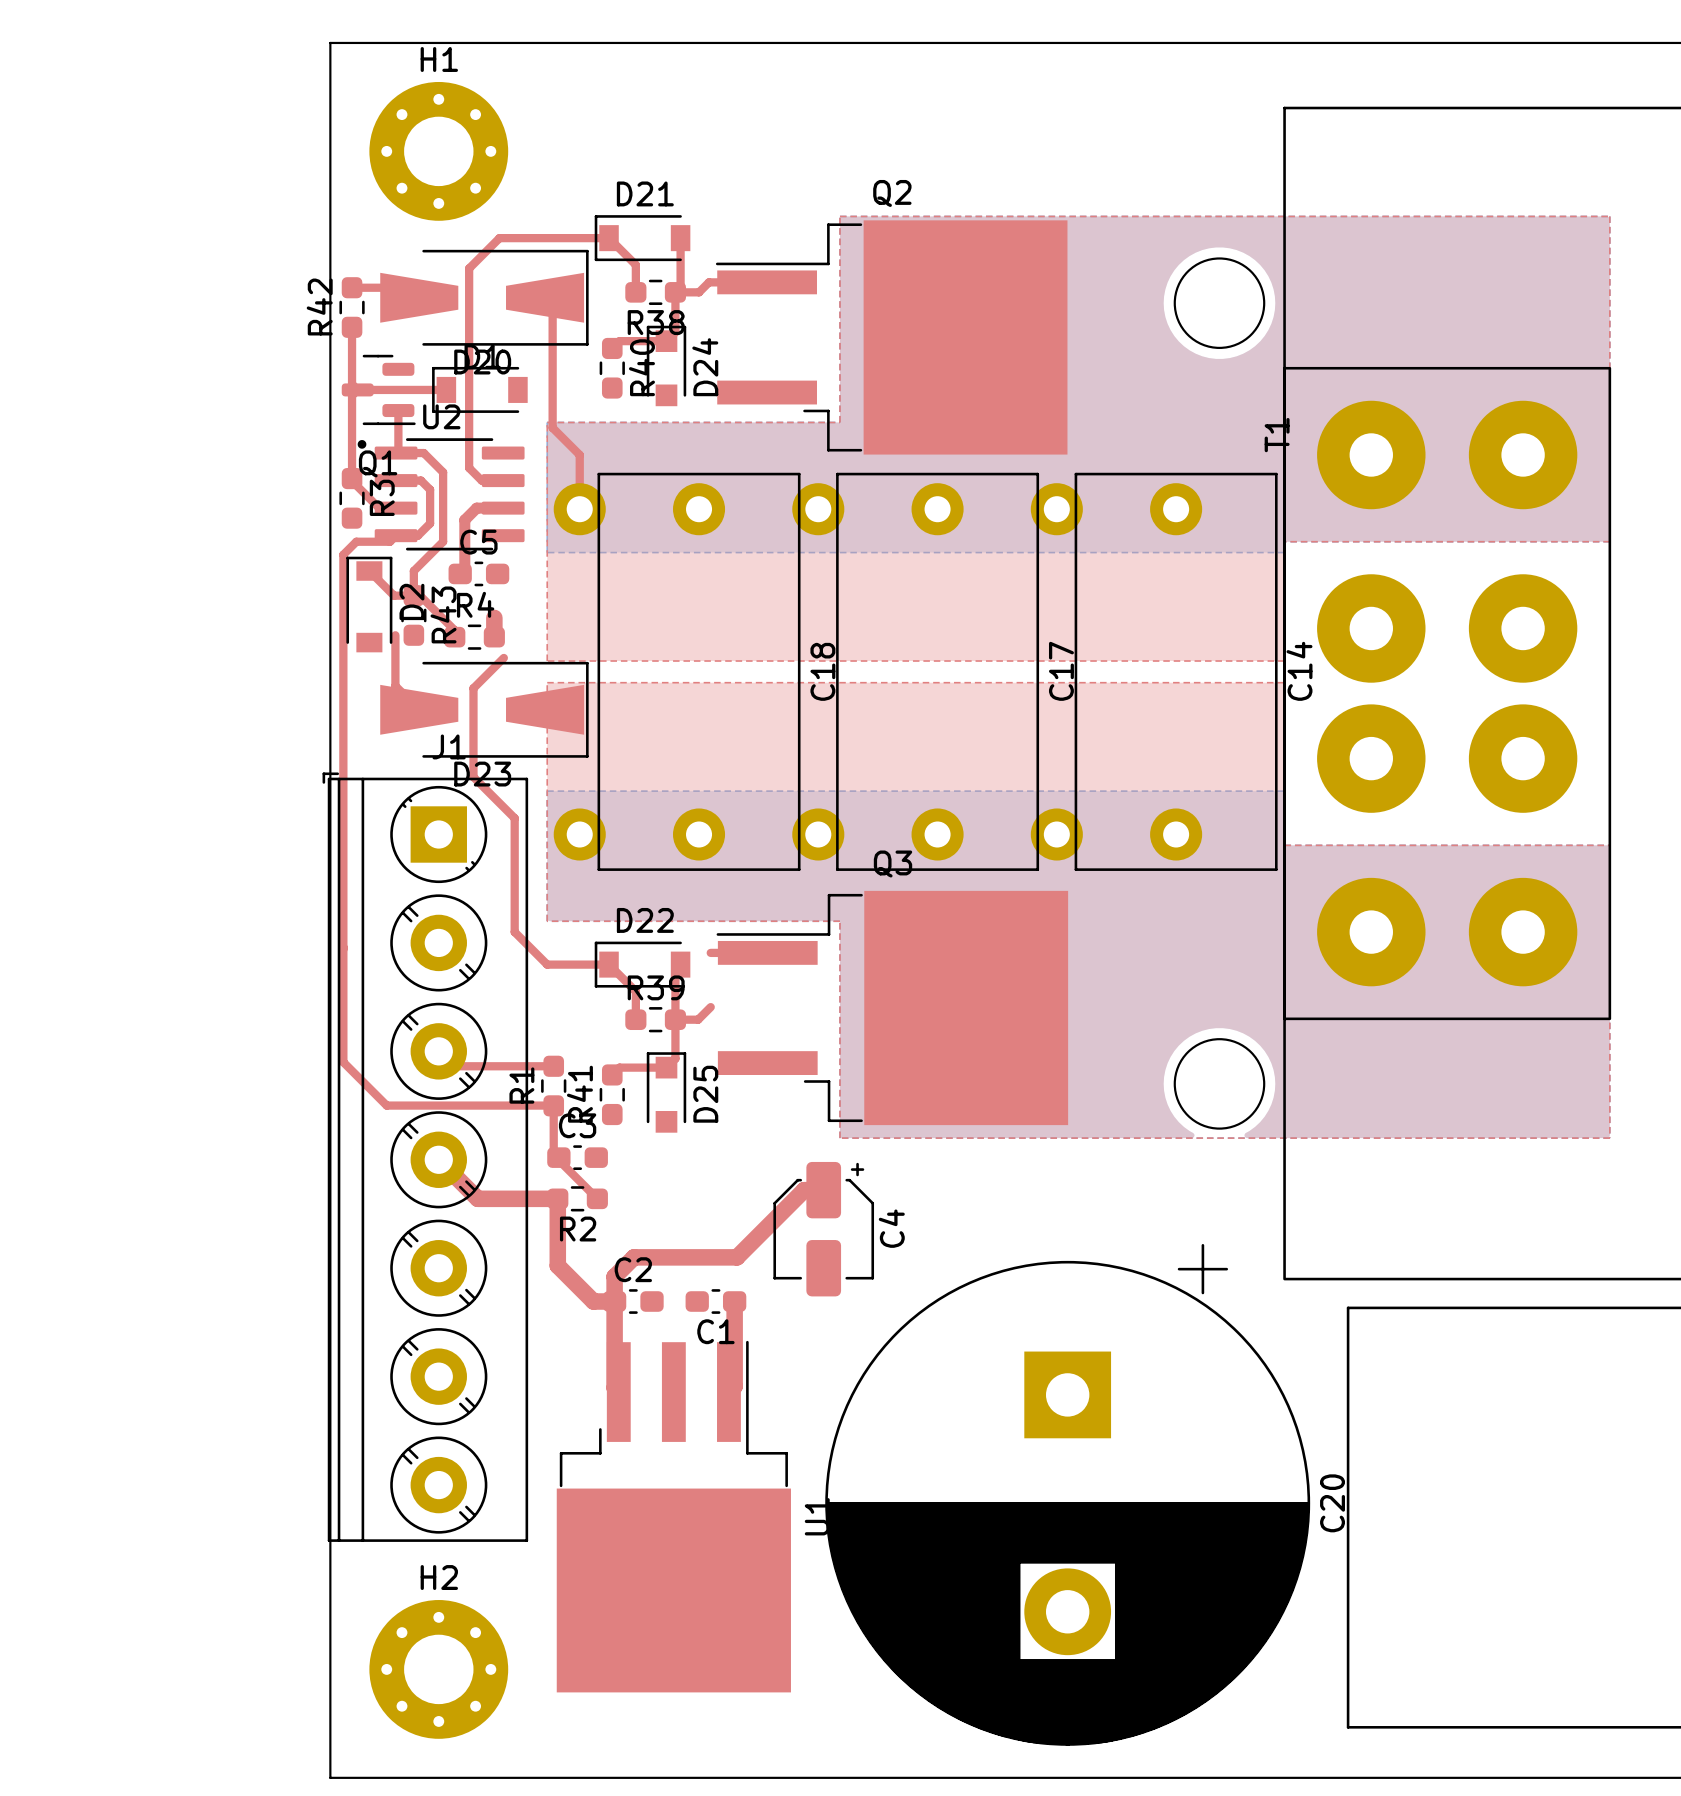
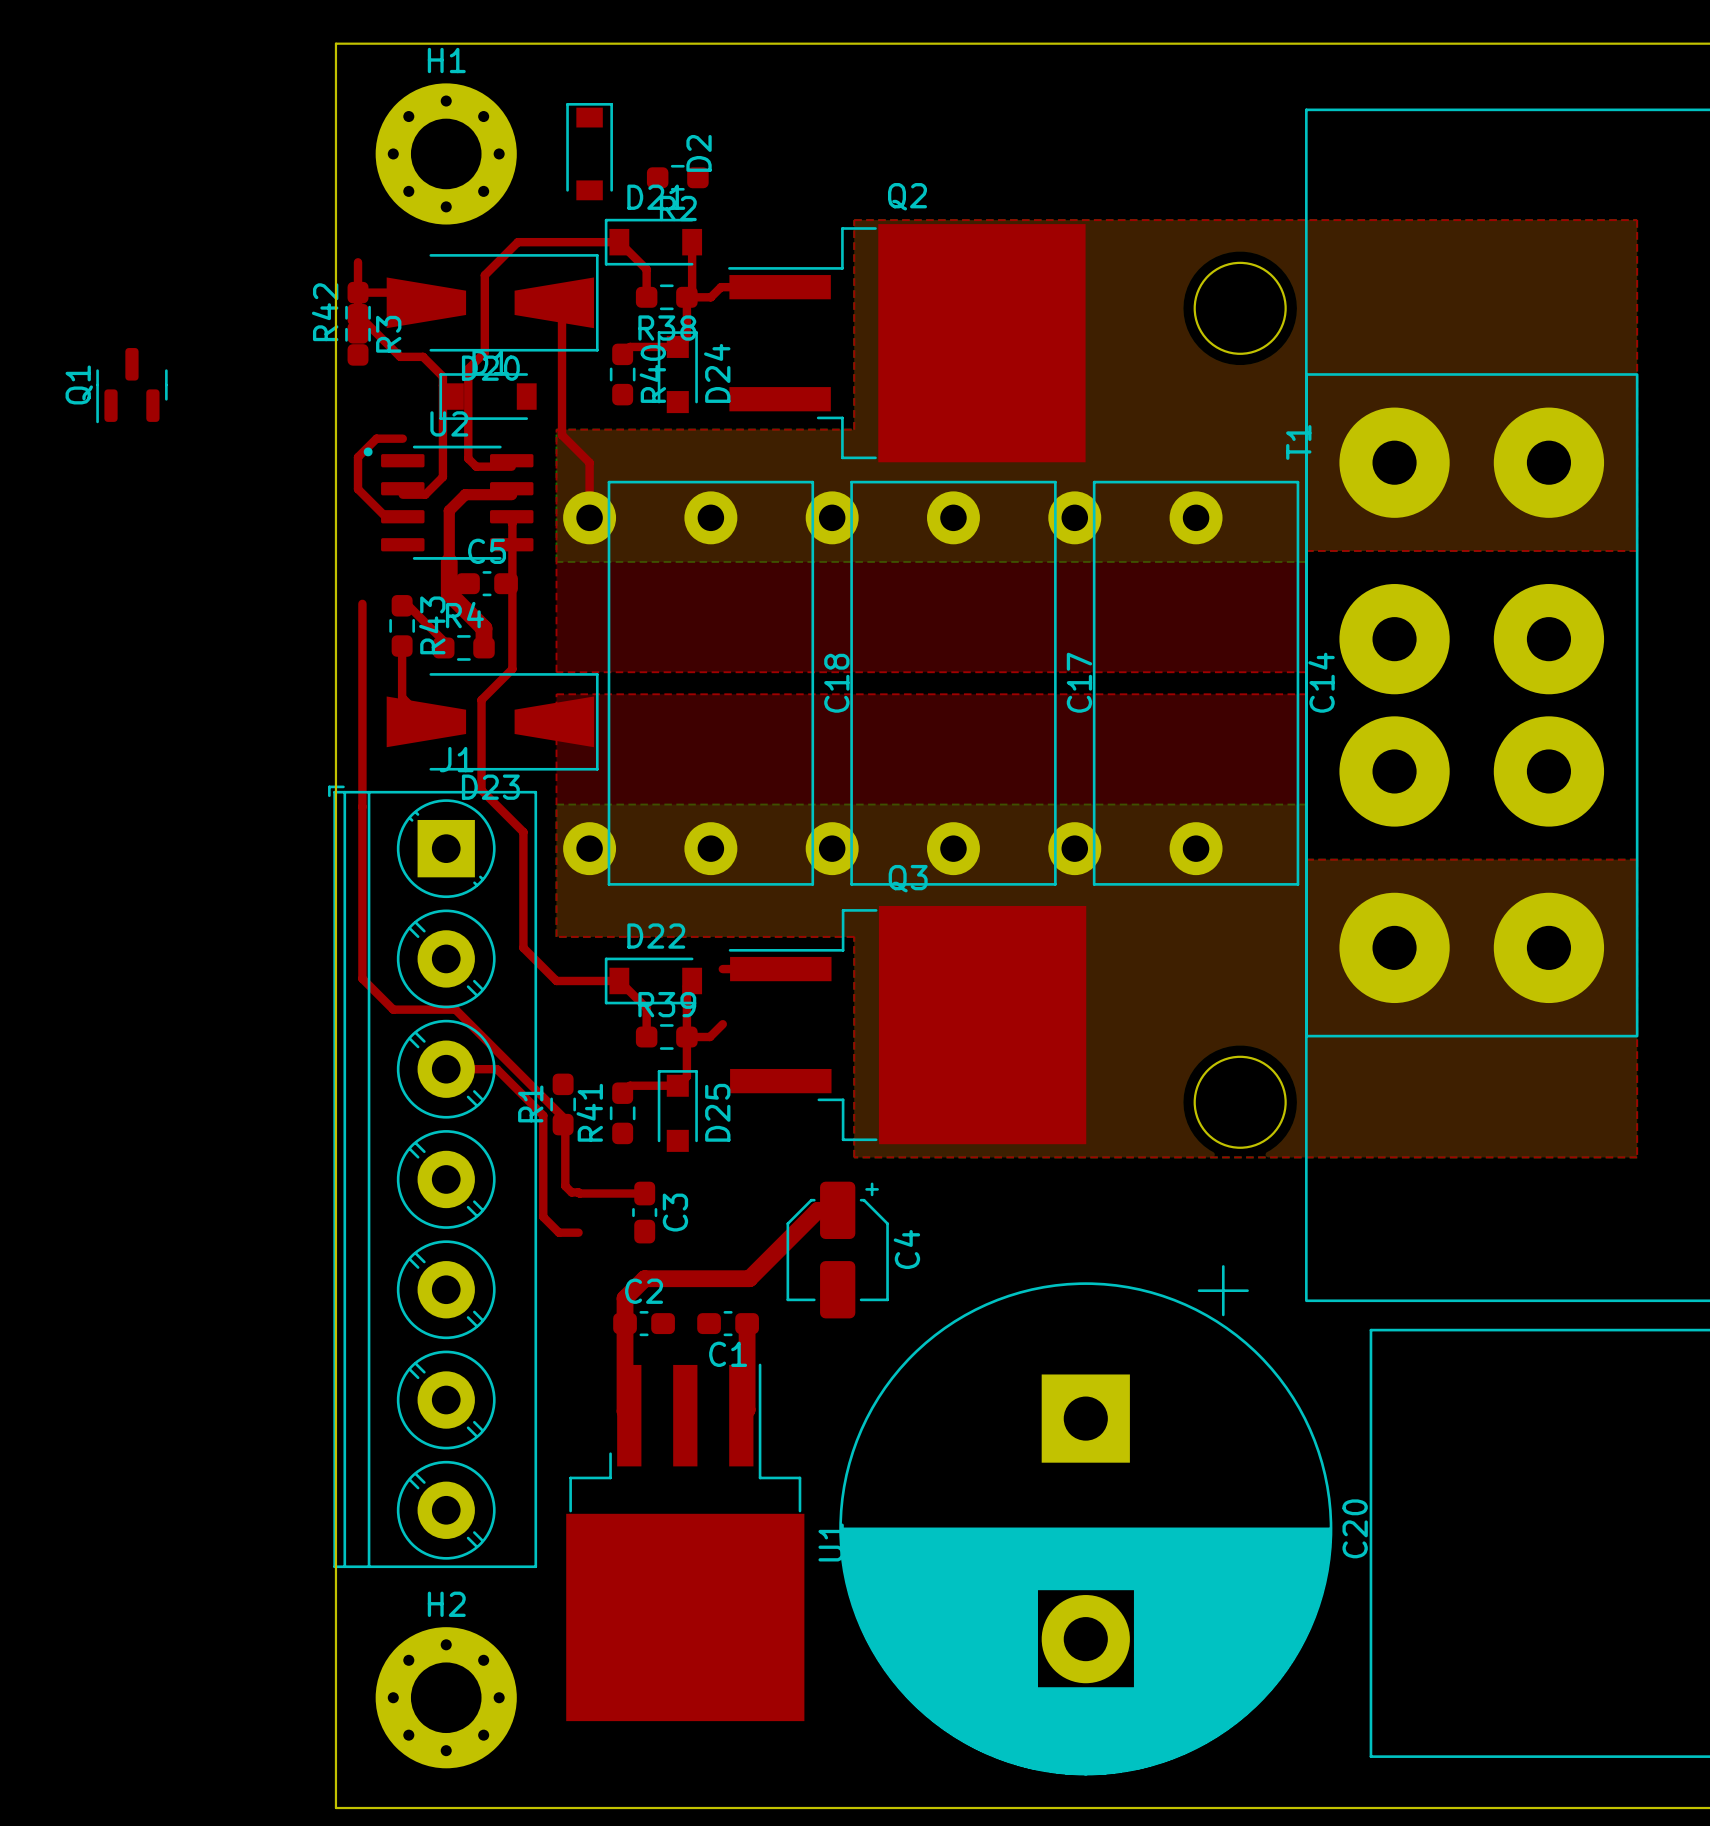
top track: (509, 238) (499, 238) (469, 268) (469, 468) (481, 480) (503, 480) -> (517, 242) (484, 275) (484, 352) (468, 368) (468, 458) (476, 466) (511, 466)
top track: none -> (358, 262) (358, 314) (400, 356) (423, 356) (442, 376) (442, 477) (425, 494) (402, 494)
top track: (352, 327) (352, 384) (357, 389) -> none
top track: (357, 389) (352, 395) (352, 449) -> (402, 438) (376, 438) (358, 457)
top track: (357, 389) (446, 389) -> none
Q1 rotation: 0° (378, 389) -> 90° clockwise (131, 385)
Q1 position: (378, 389) -> (131, 385)
top track: (398, 410) (398, 450) (396, 453) (423, 453) (443, 472) (443, 541) (413, 571) (413, 595) -> none
top track: (396, 480) (421, 480) (430, 489) (430, 523) (417, 535) (396, 535) (389, 541) (356, 541) (343, 554) (343, 1062) (386, 1105) (553, 1105) -> none
top track: none -> (511, 494) (465, 494) (449, 510) (449, 593) (484, 628) (484, 647)
R3 position: (352, 498) -> (358, 334)
top track: (503, 508) (476, 508) (464, 520) (464, 569) (460, 573) -> none
top track: none -> (511, 522) (512, 669)
top track: (369, 571) (394, 595) -> none
top track: none -> (362, 603) (362, 978) (393, 1009) (455, 1009) (565, 1119) (565, 1186) (571, 1192) (644, 1193)
top track: (401, 595) (420, 595) (454, 630) (454, 637) -> (408, 605) (443, 641) (443, 647)
D2 name position: D2 (411, 601) -> D2 (699, 153)
D2 position: (369, 604) -> (589, 151)
R43 position: (413, 615) -> (402, 625)
top track: (494, 617) (494, 637) -> none
R4 position: (474, 637) -> (463, 647)
top track: (438, 1048) (438, 1051) (453, 1066) (553, 1066) -> none
top track: none -> (446, 1069) (496, 1069) (543, 1115) (543, 1216) (558, 1232) (578, 1232)
top track: (553, 1105) (553, 1152) (558, 1160) (597, 1198) -> none
C3 rotation: 0° (577, 1157) -> 90° clockwise (644, 1212)
C3 position: (577, 1157) -> (644, 1212)
top track: (438, 1159) (477, 1198) (557, 1198) (557, 1265) (593, 1301) (614, 1301) -> none
R2 position: (577, 1198) -> (677, 177)

